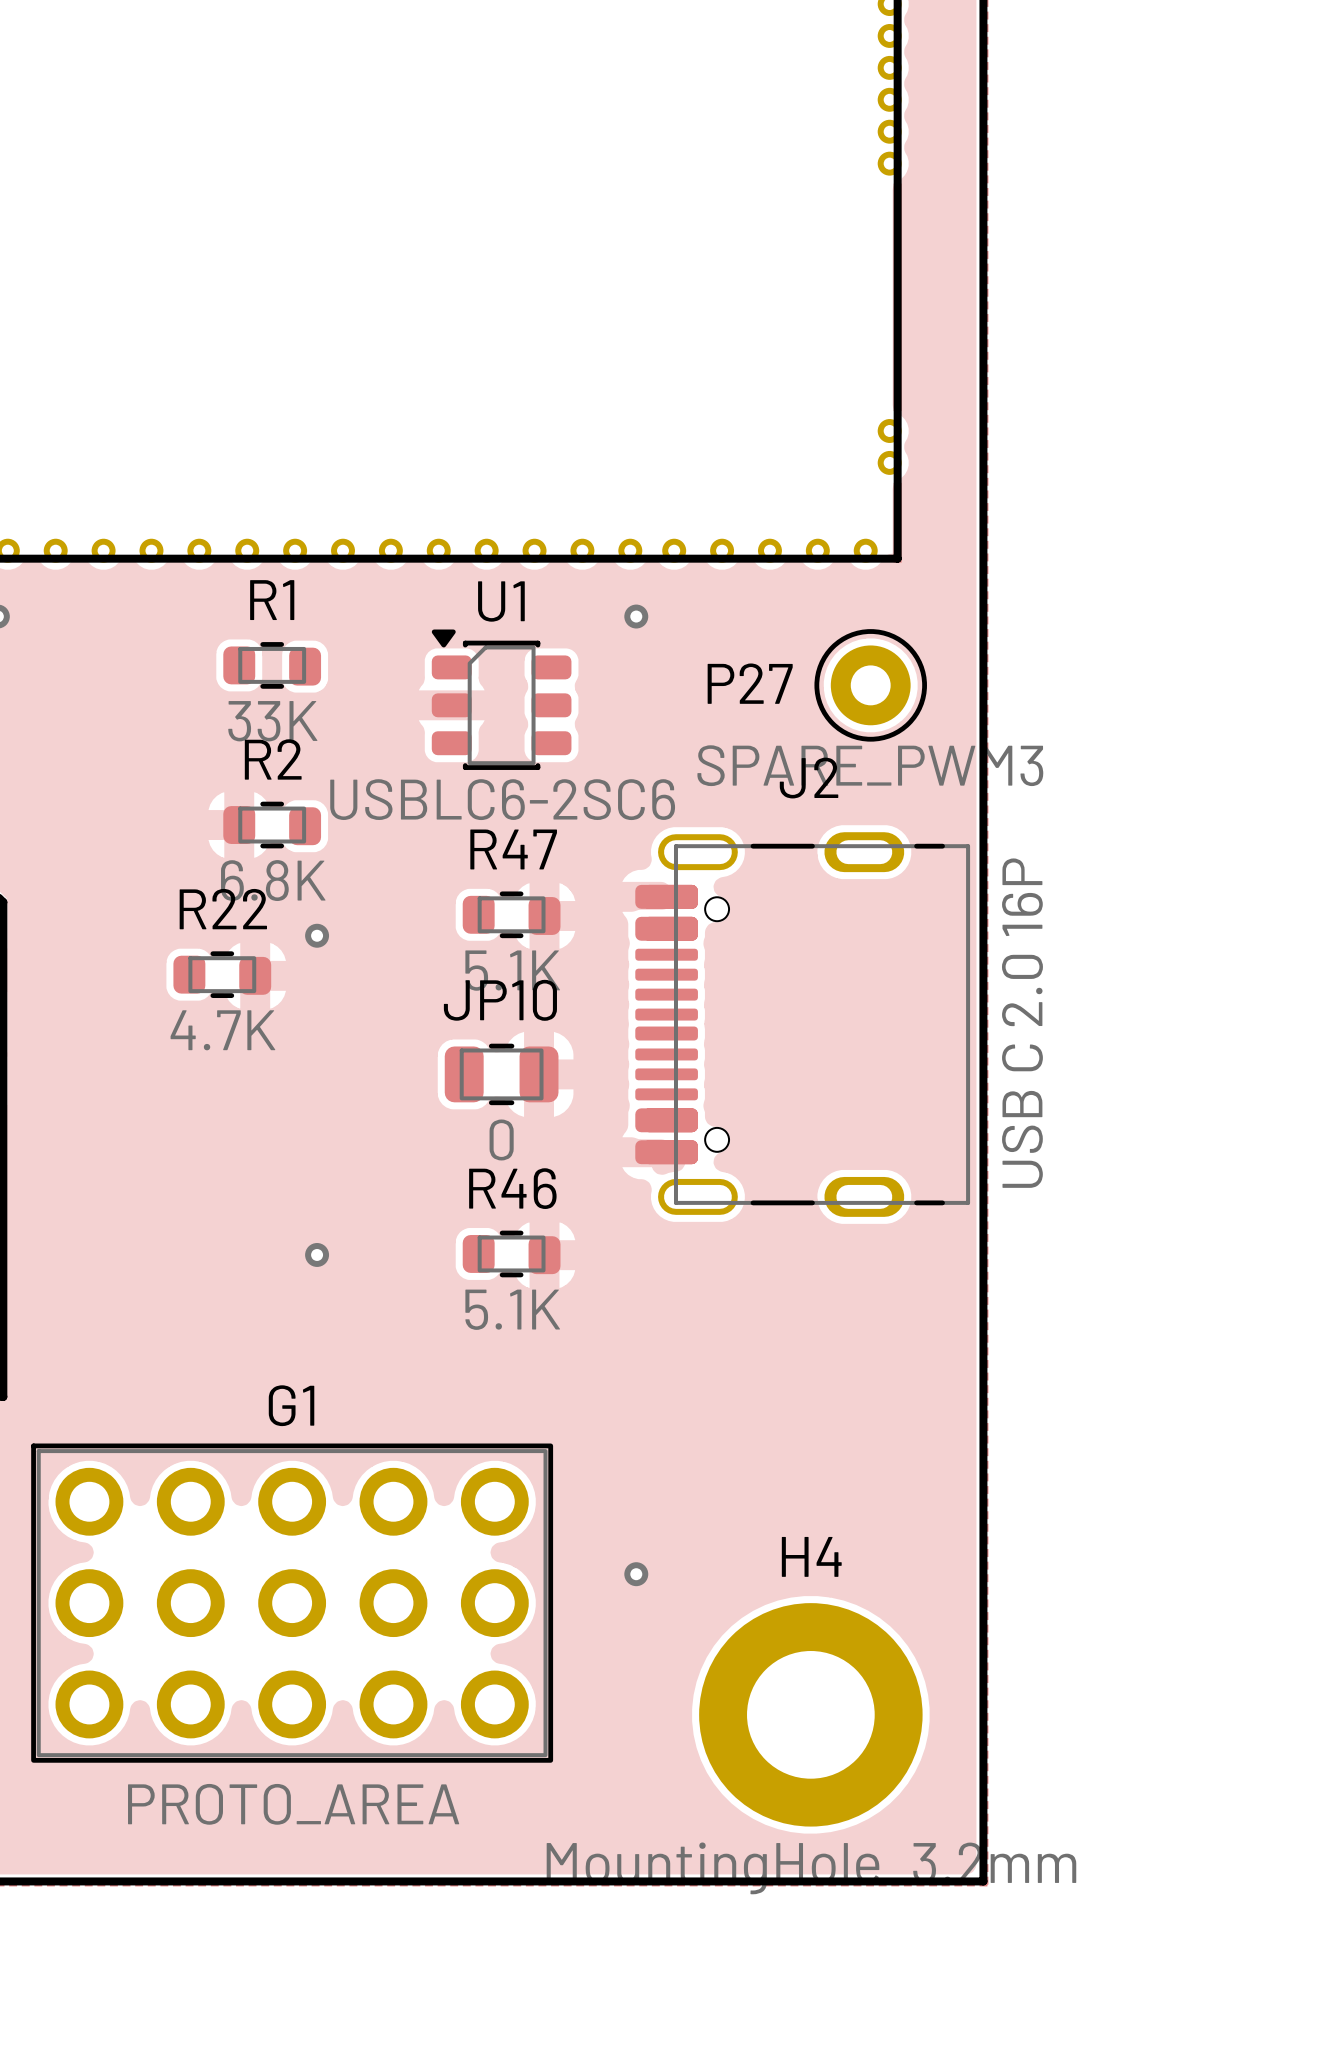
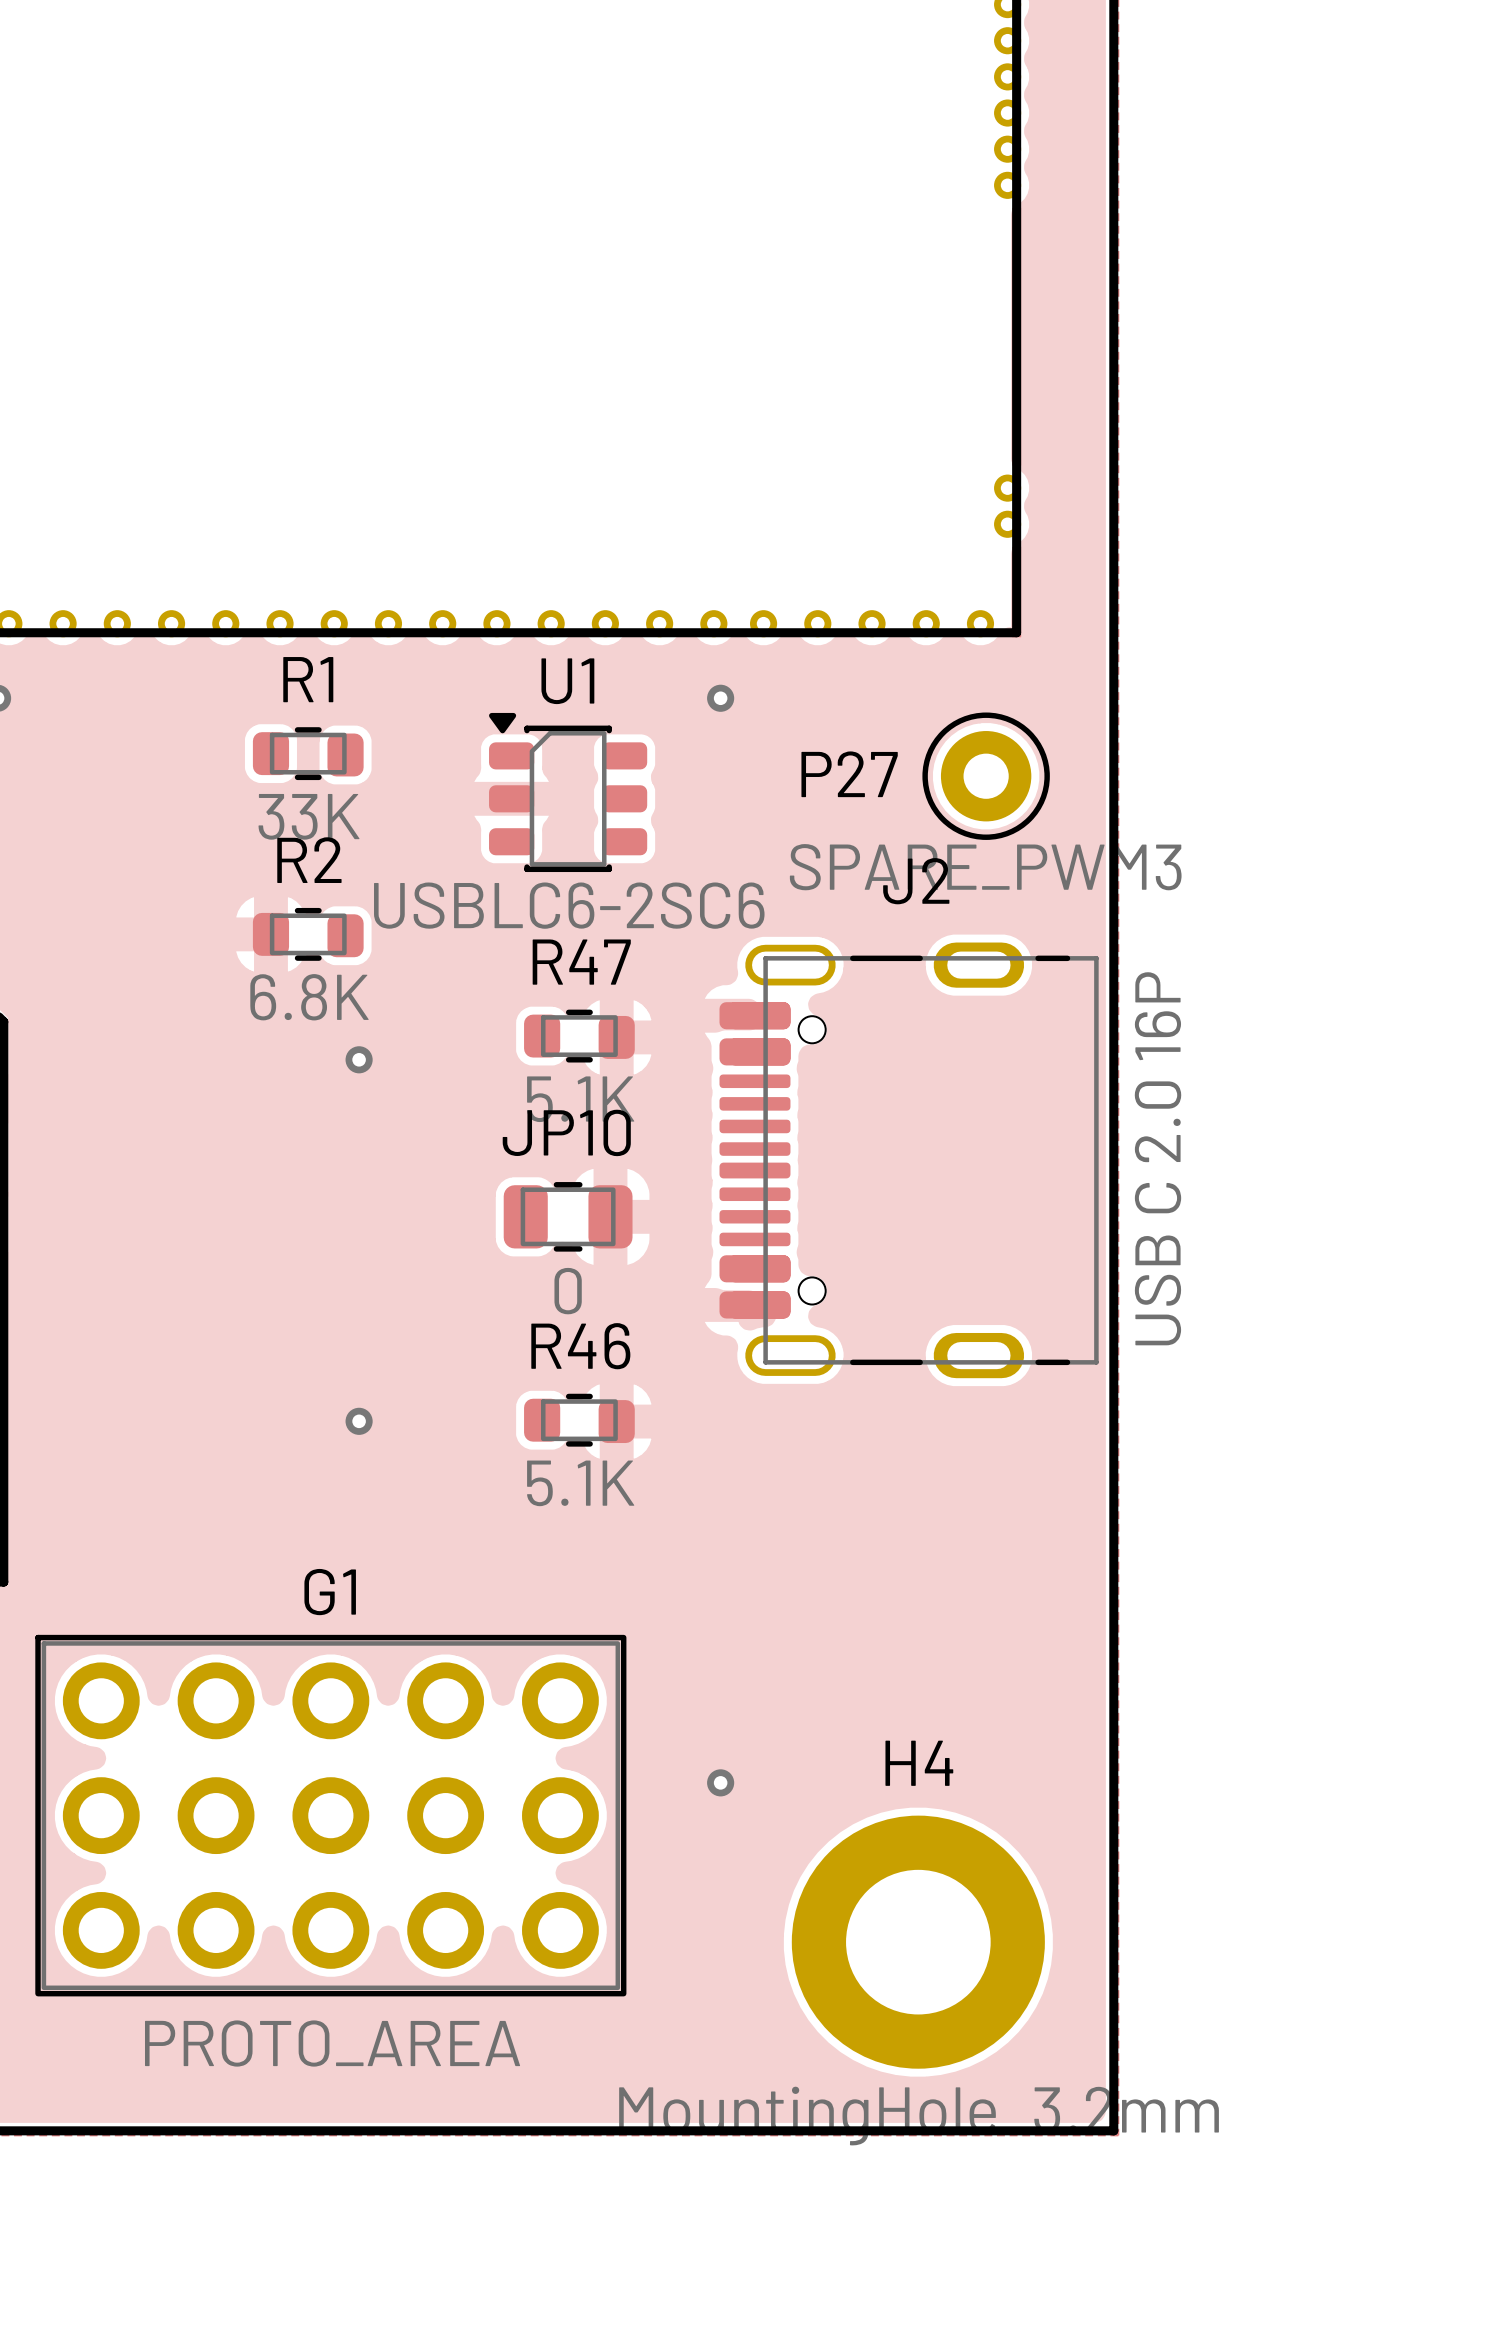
R22: 4.7K (222, 974) -> none

